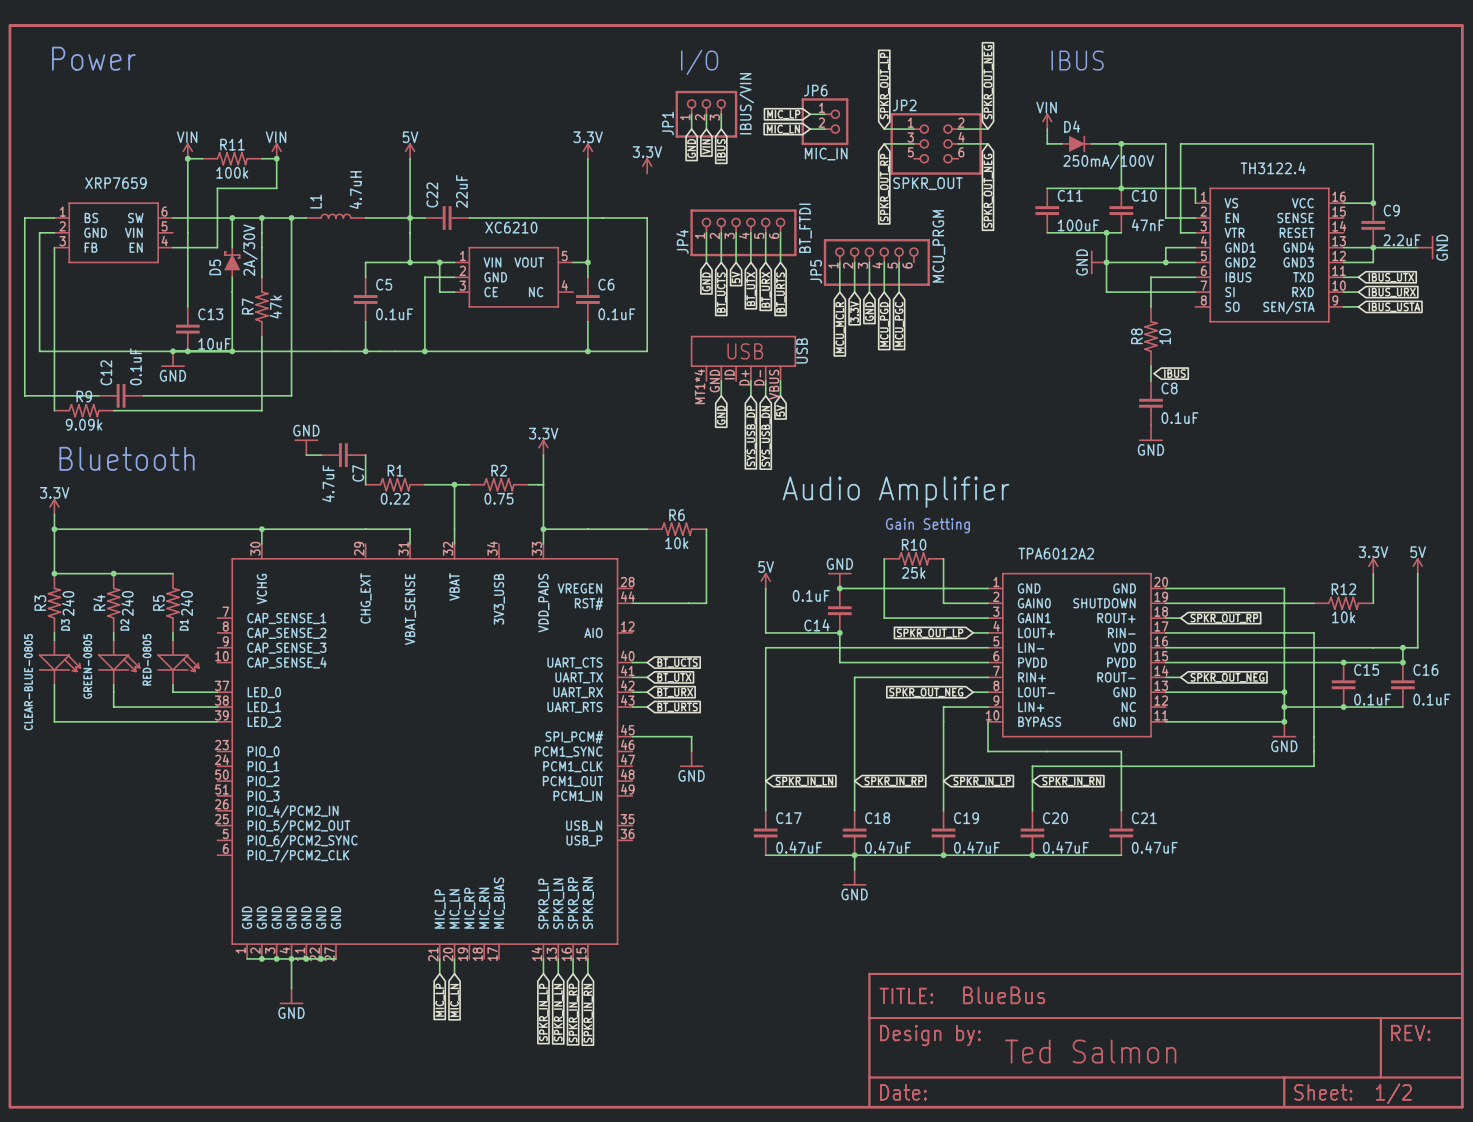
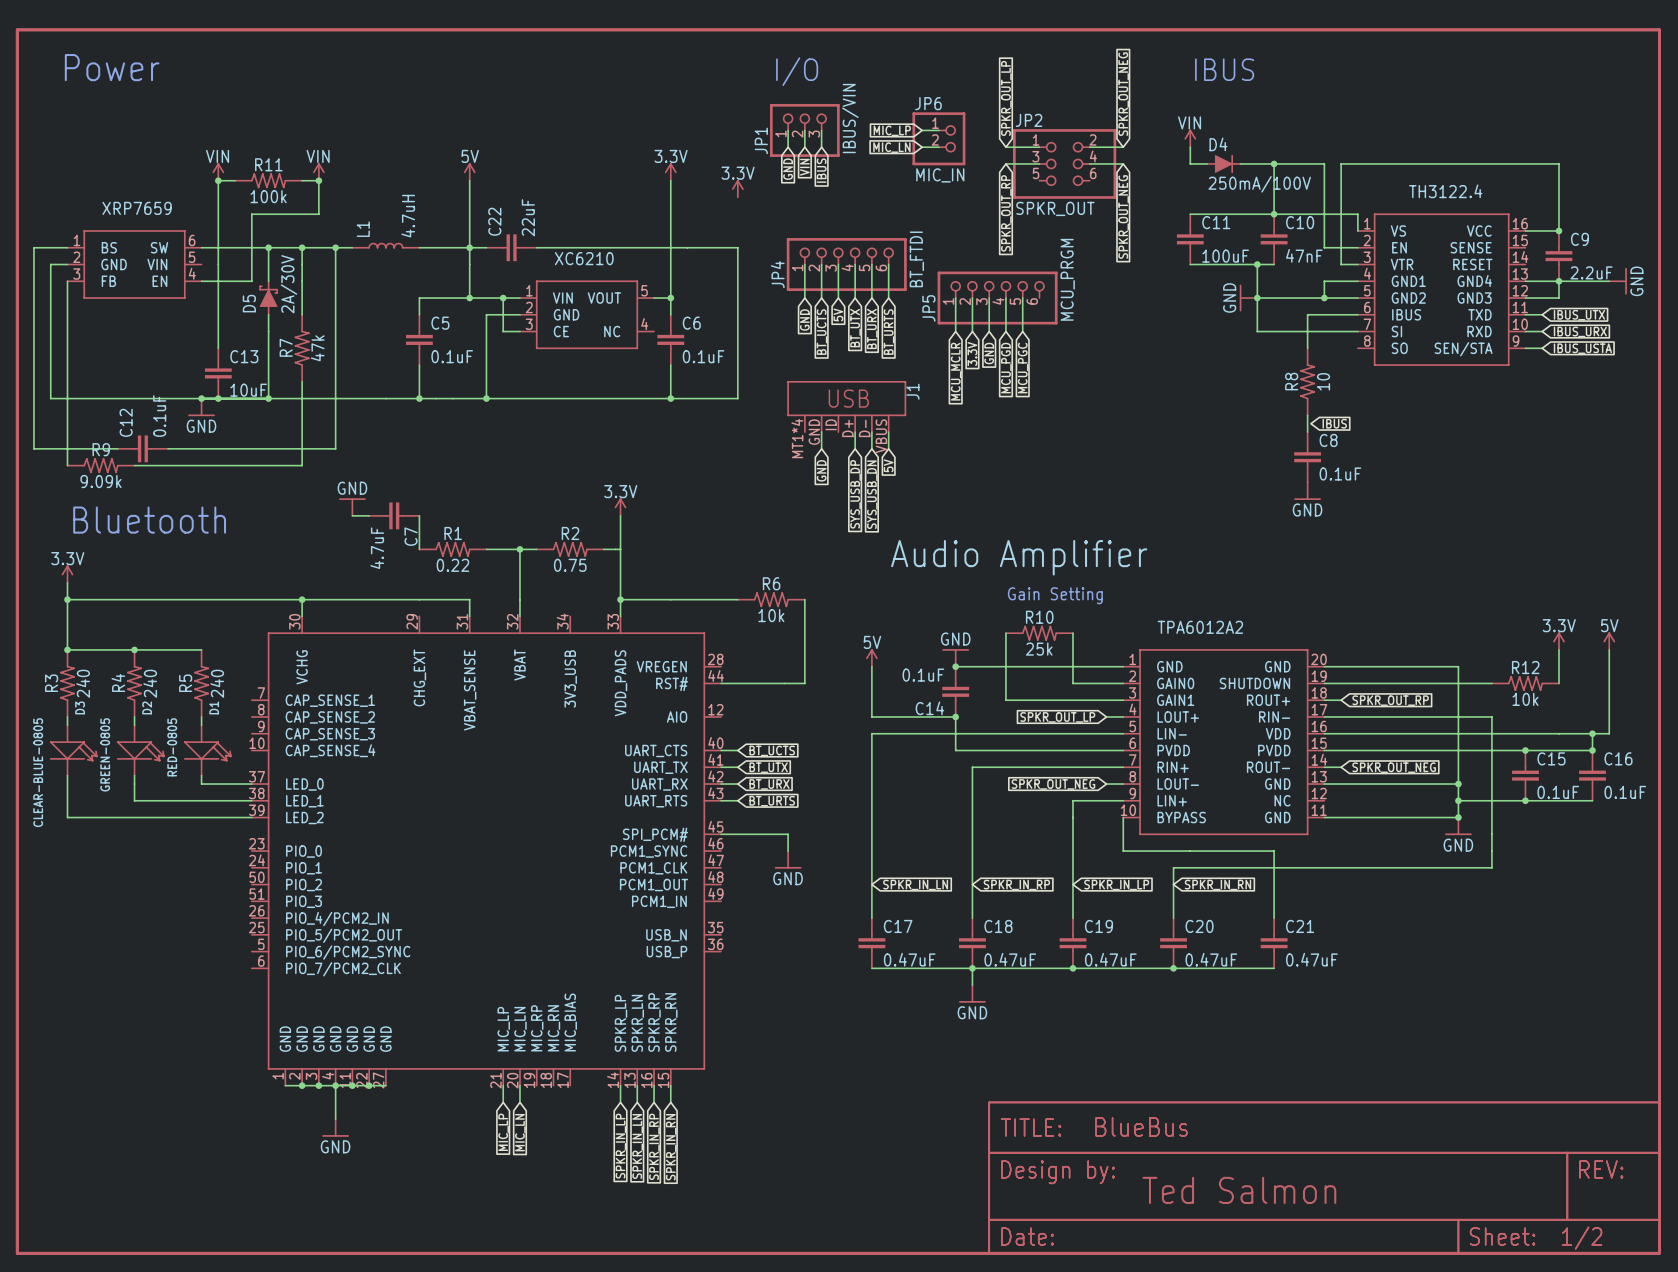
USB name: USB (802, 350) -> J1 (912, 391)

